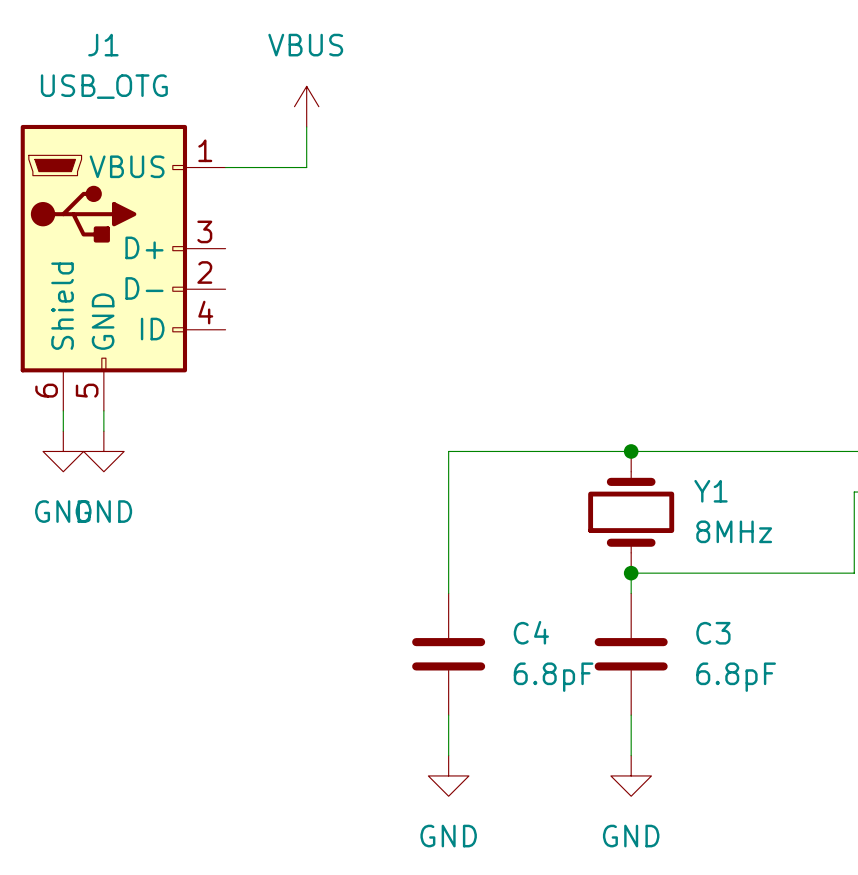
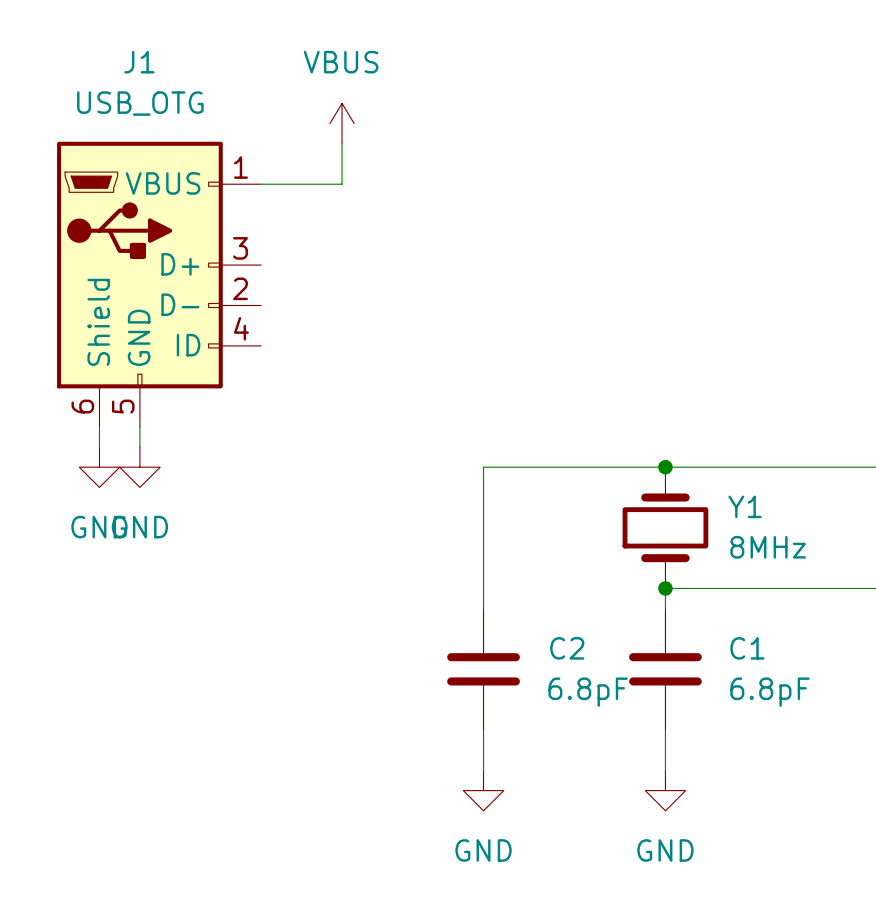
C4 name: C4 (531, 632) -> C2 (567, 648)
C3 name: C3 (713, 633) -> C1 (747, 648)

